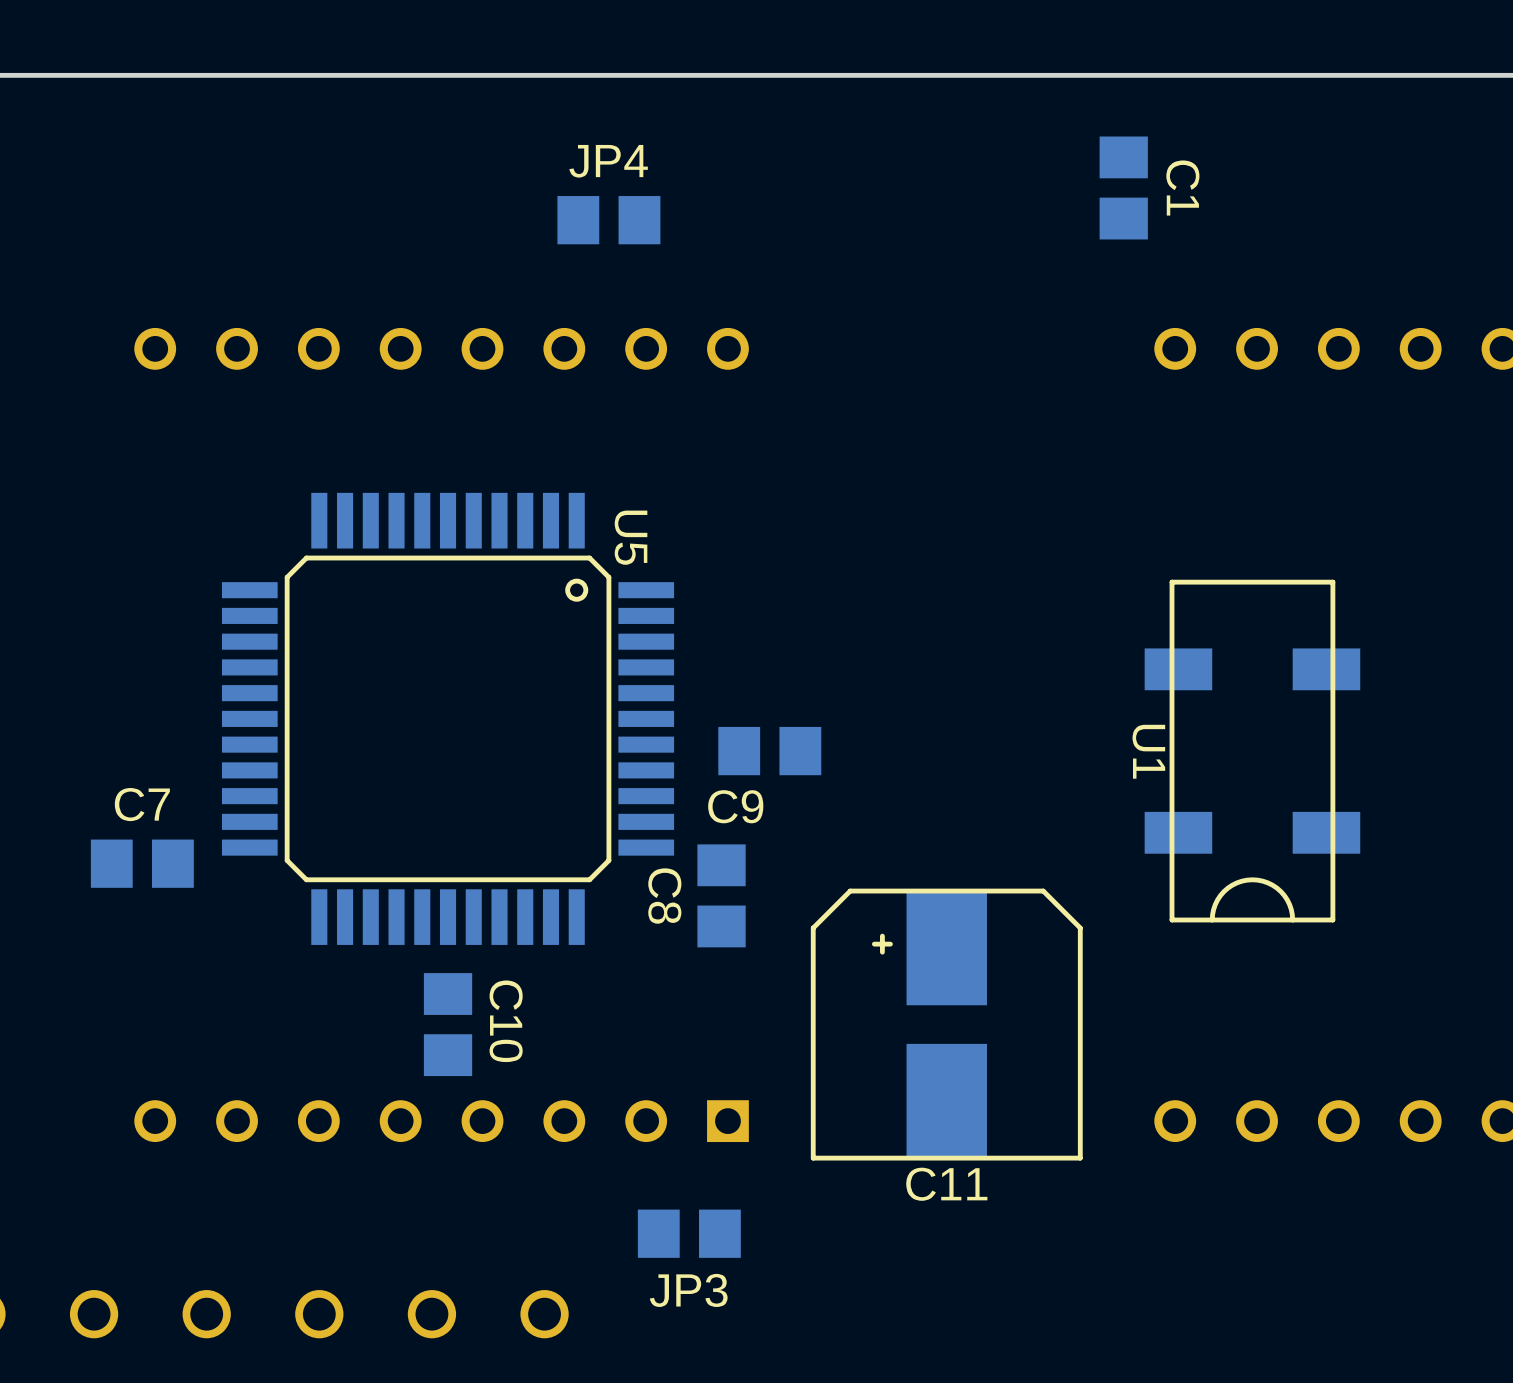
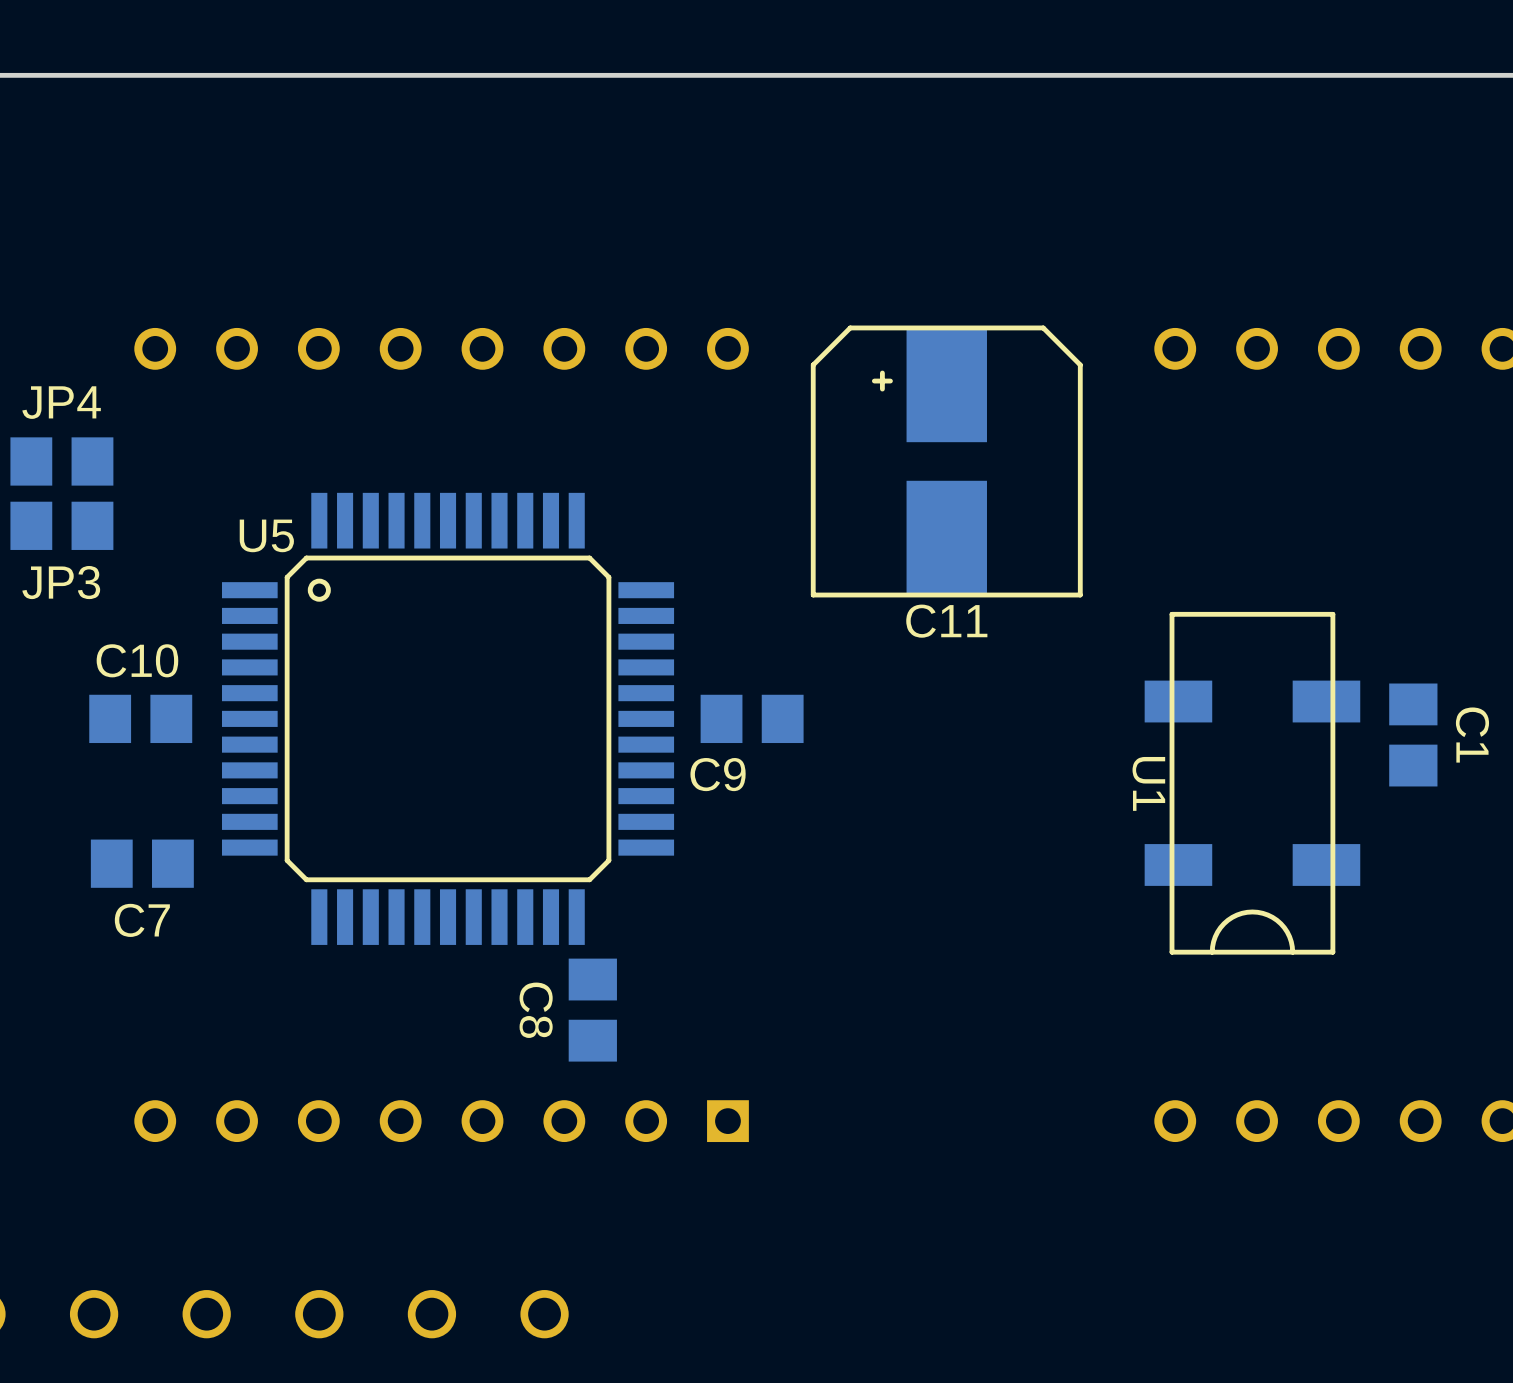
C1 position: (1123, 187) -> (1413, 734)
JP4 position: (608, 220) -> (61, 461)
U5 rotation: 0° (448, 718) -> 90° counterclockwise (448, 718)
C9 position: (769, 751) -> (752, 718)
U1 position: (1252, 751) -> (1252, 783)
C7 name position: C7 (142, 804) -> C7 (142, 920)
C8 position: (721, 895) -> (592, 1010)
C10 name position: C10 (506, 1021) -> C10 (137, 660)
C10 rotation: 0° (448, 1024) -> 90° clockwise (140, 718)
C10 position: (448, 1024) -> (140, 718)
C11 position: (946, 1024) -> (946, 461)
JP3 position: (689, 1233) -> (61, 525)

